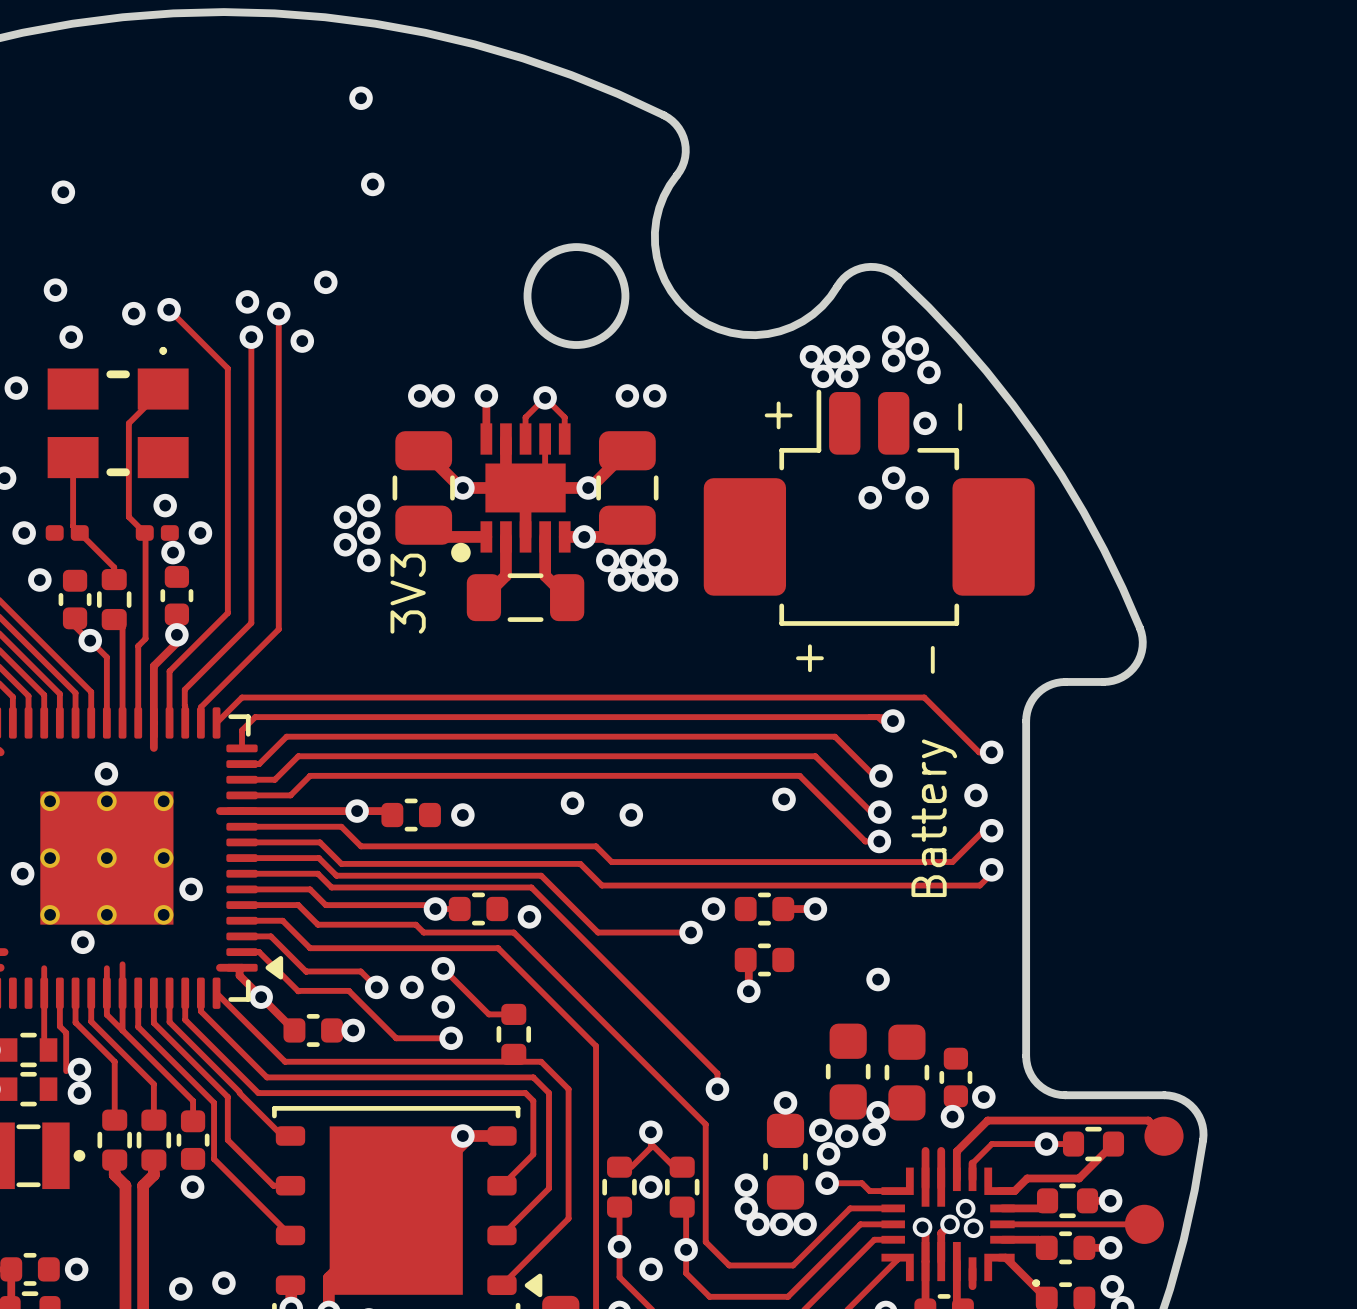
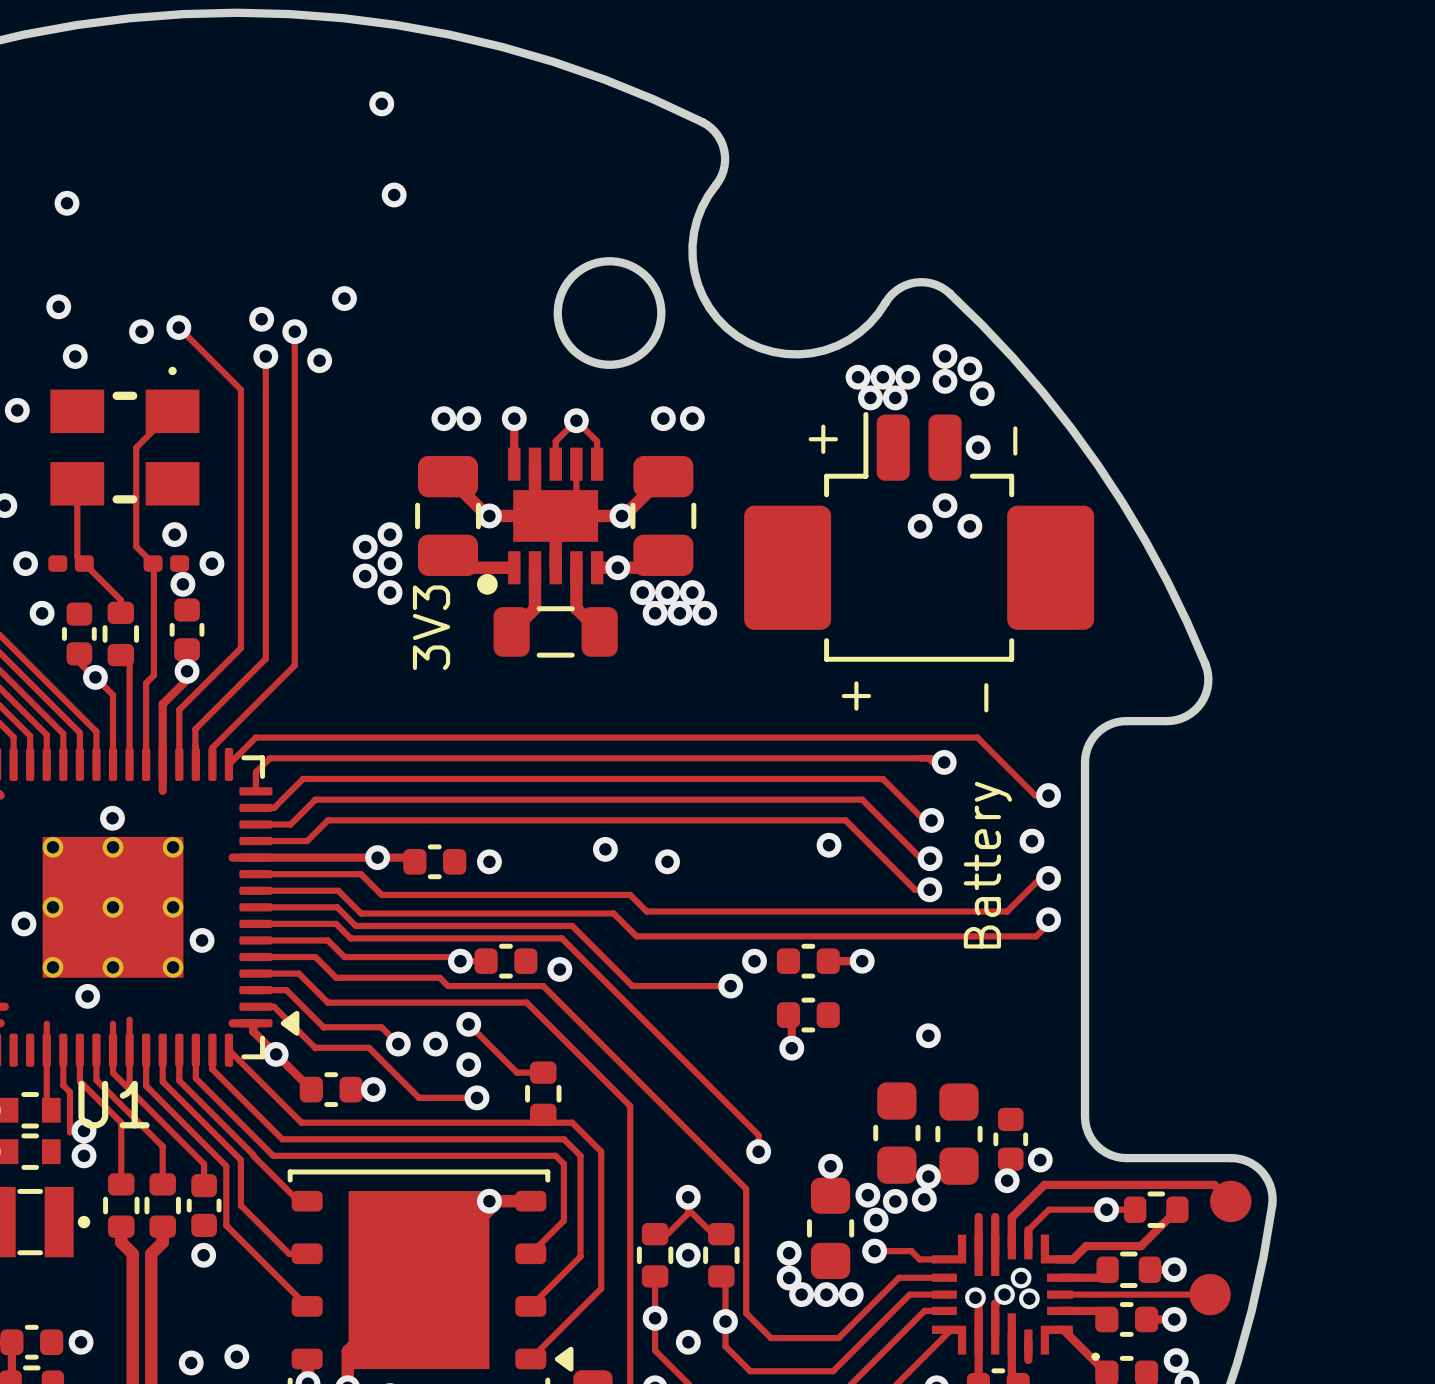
U1 name: none -> U1 (114, 1104)

